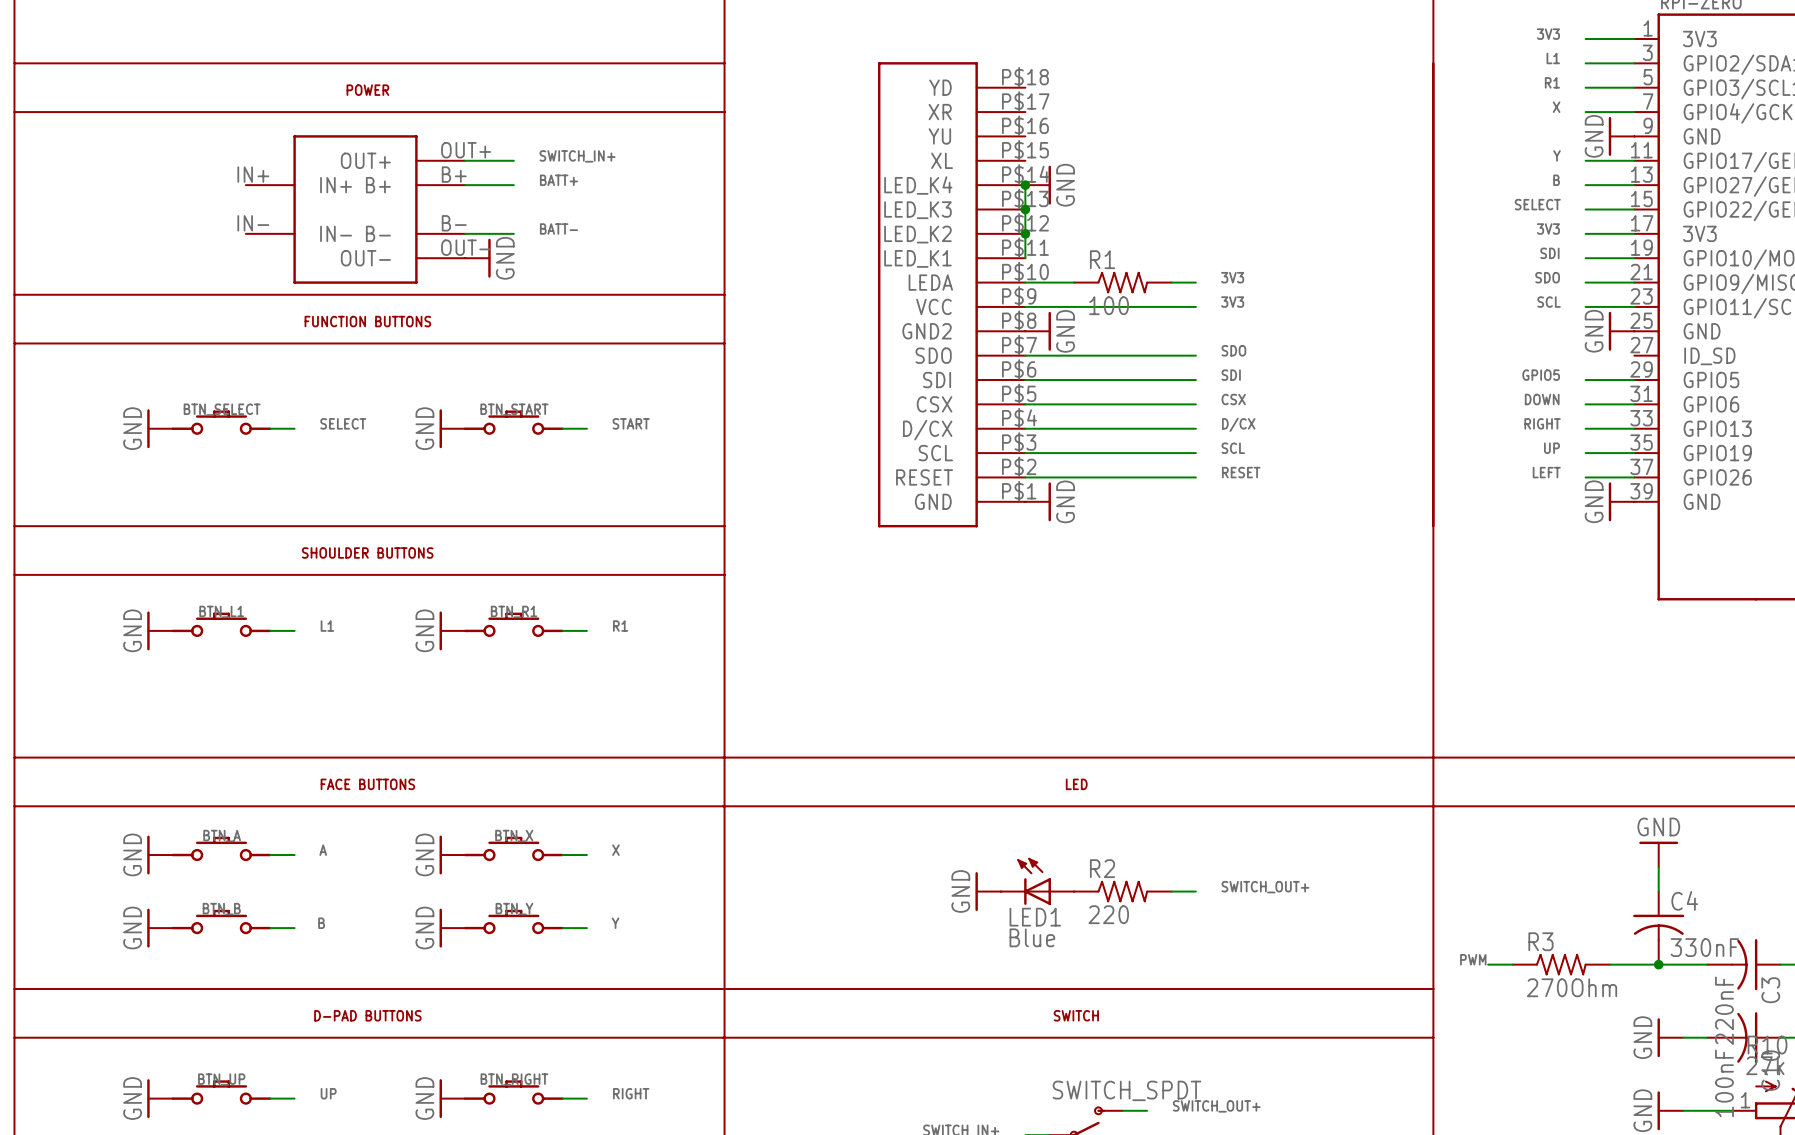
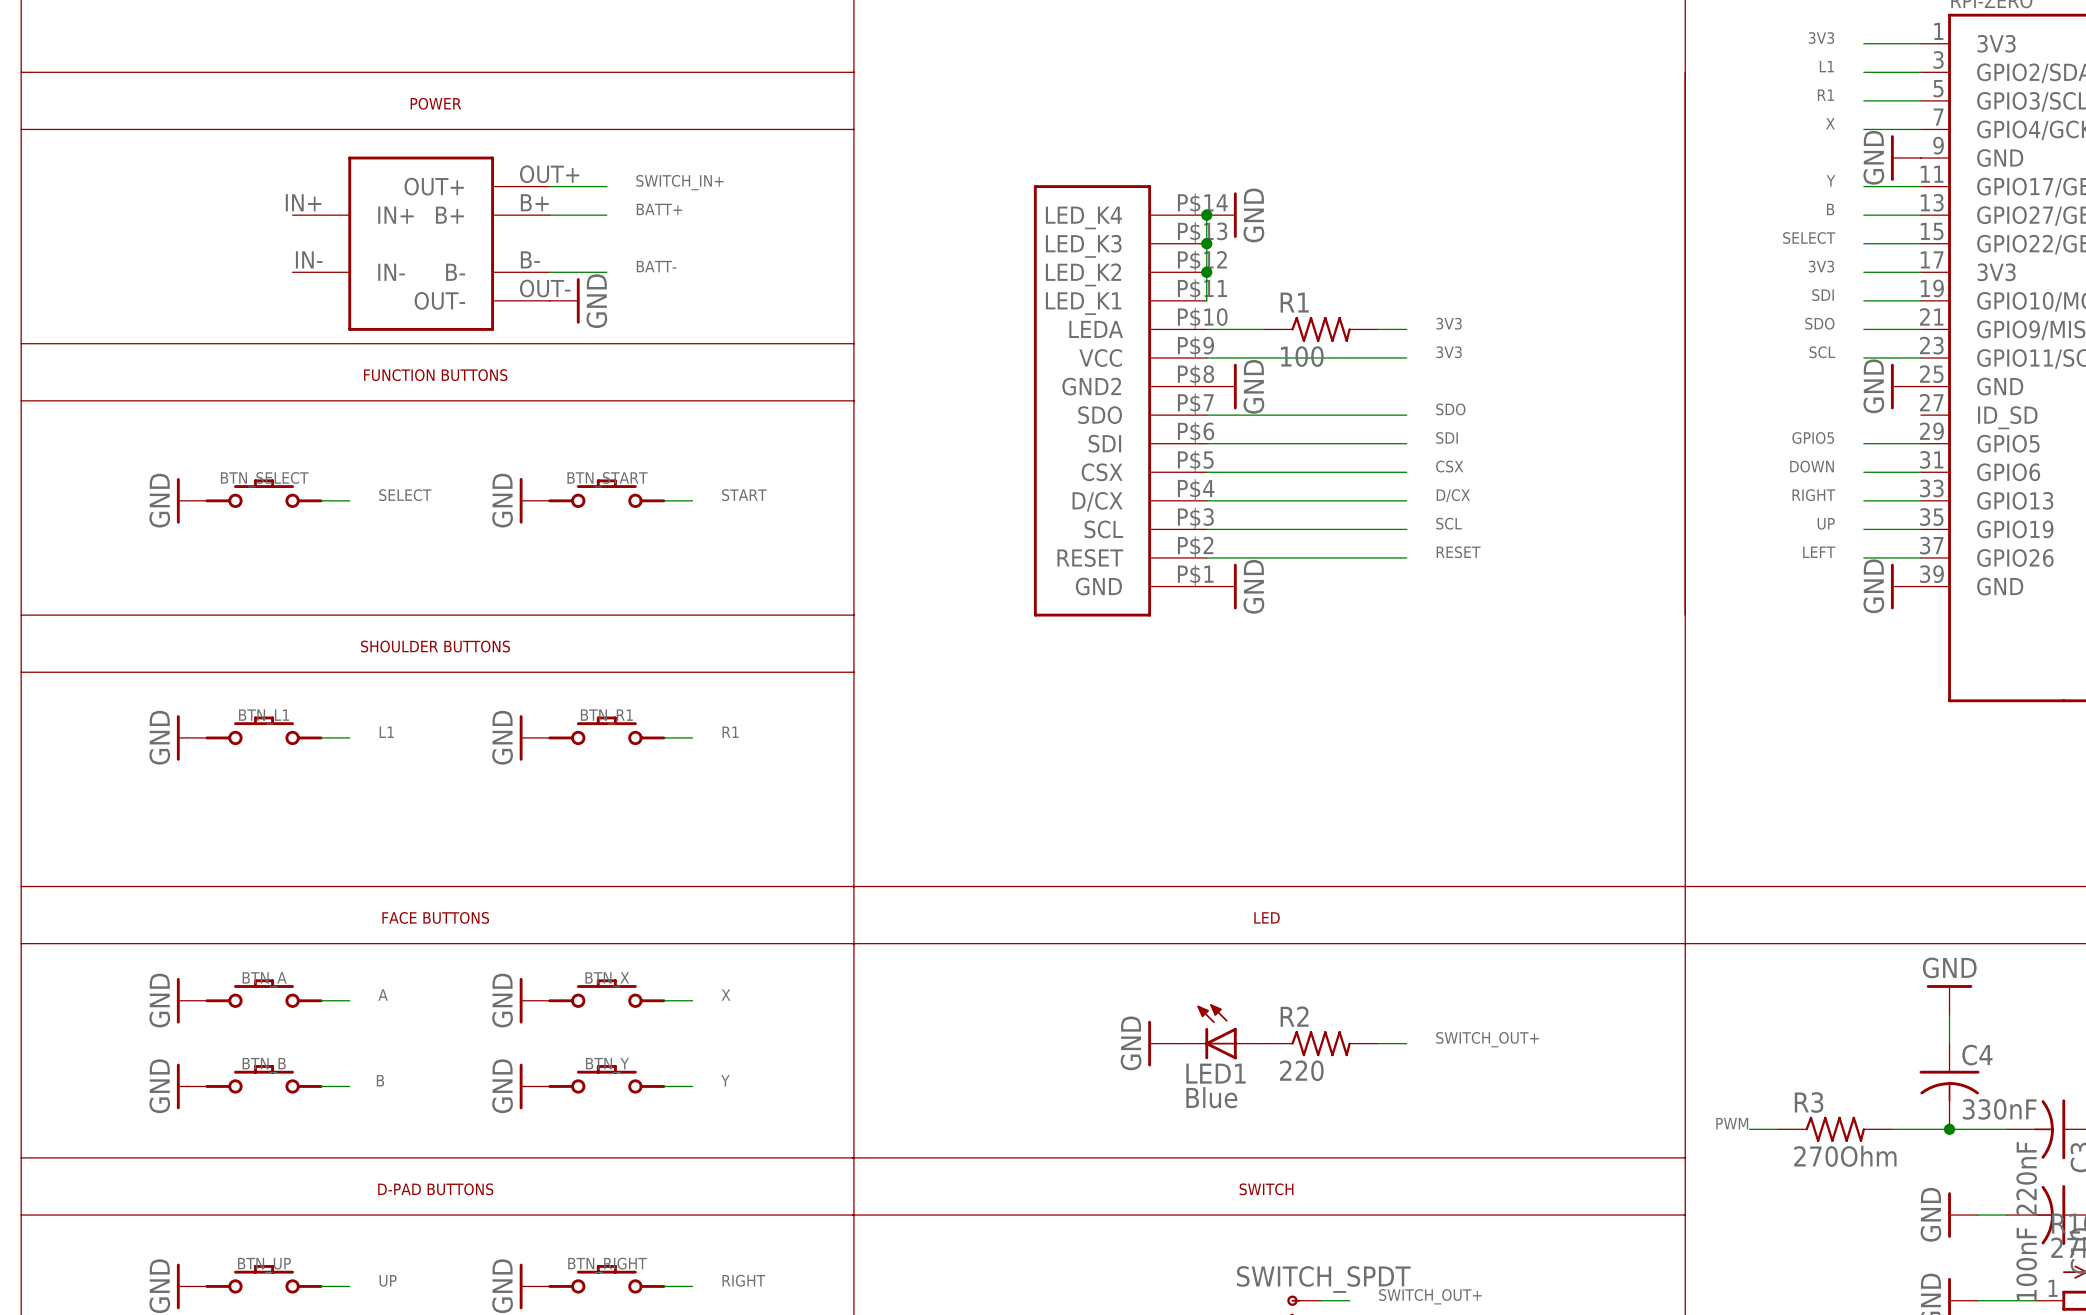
part: (951, 294) -> none
part: none -> (1120, 400)

